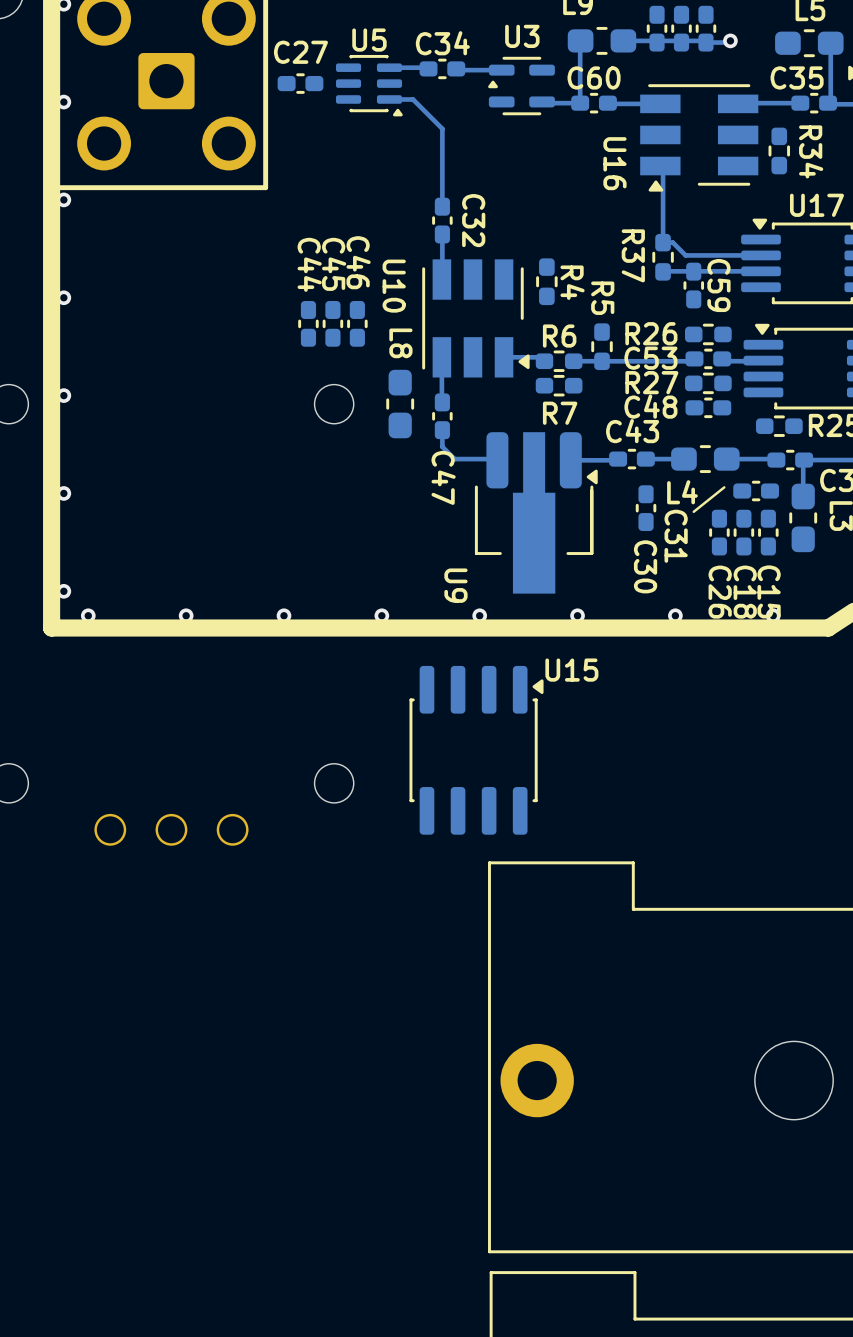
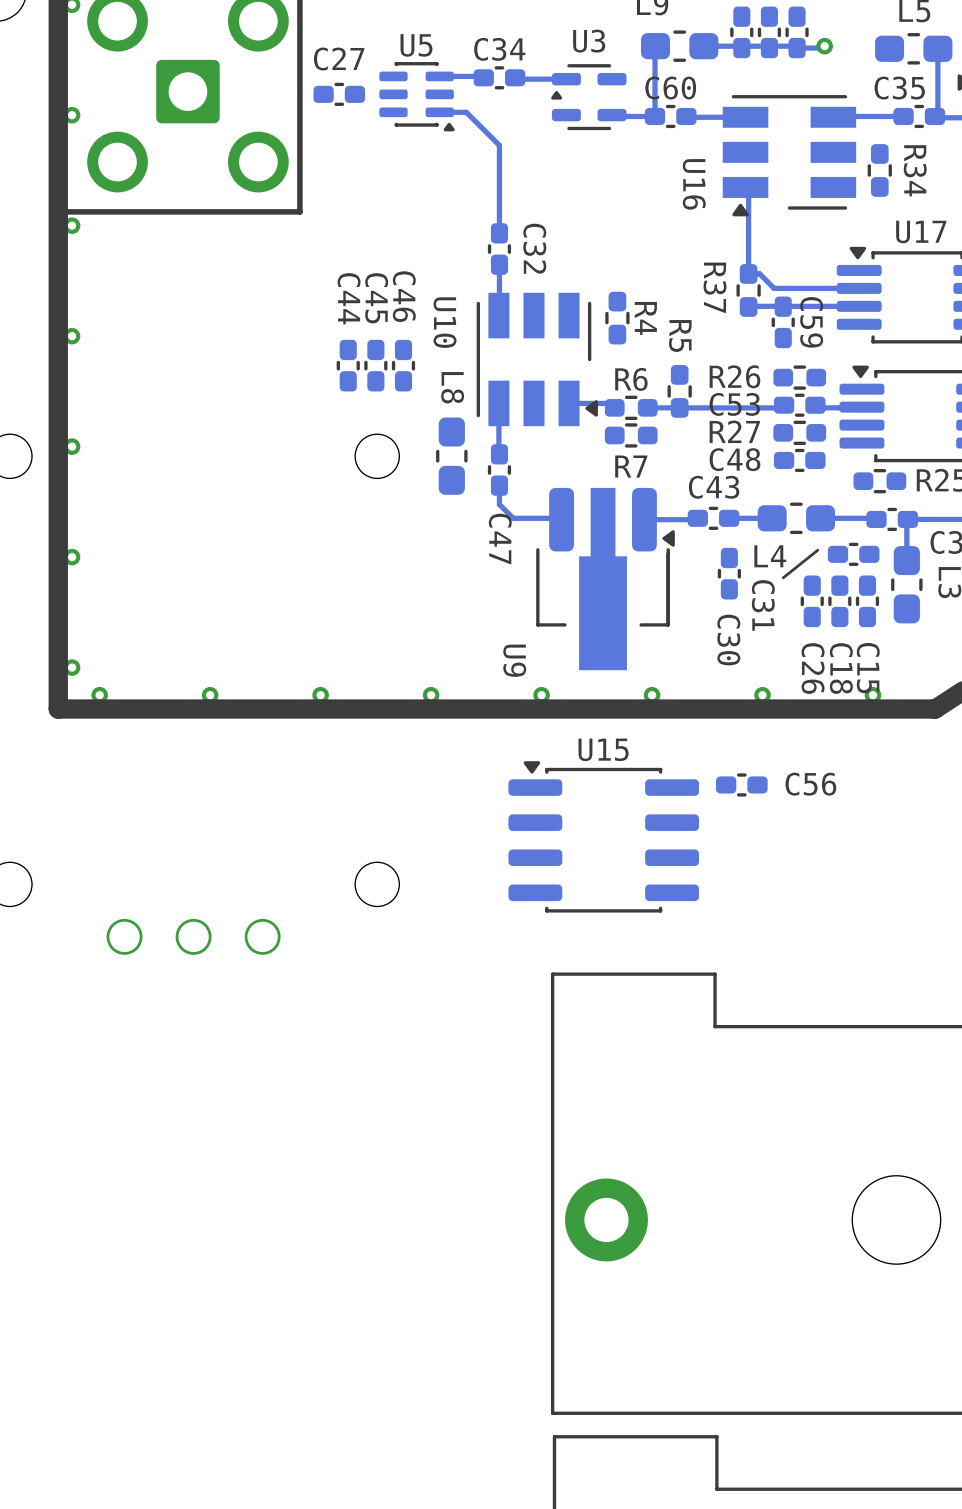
U15 name position: U15 (571, 670) -> U15 (603, 749)
C56: none -> (741, 784)
U15 rotation: 0° (476, 750) -> 90° counterclockwise (603, 836)

